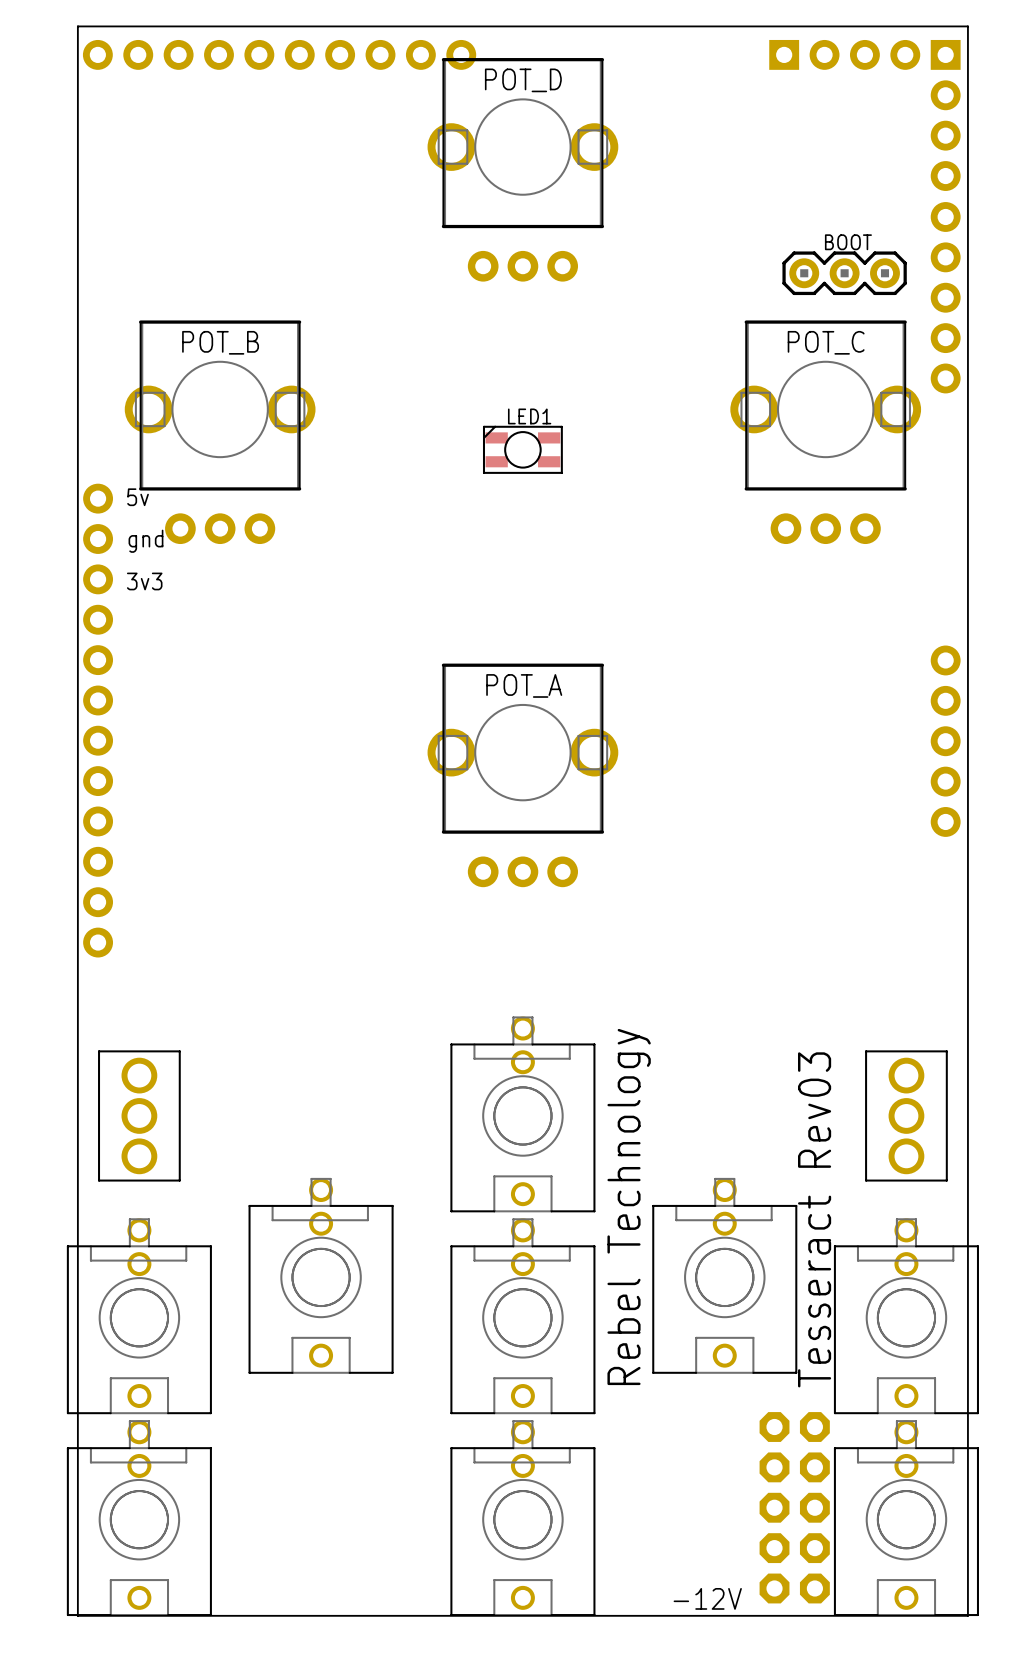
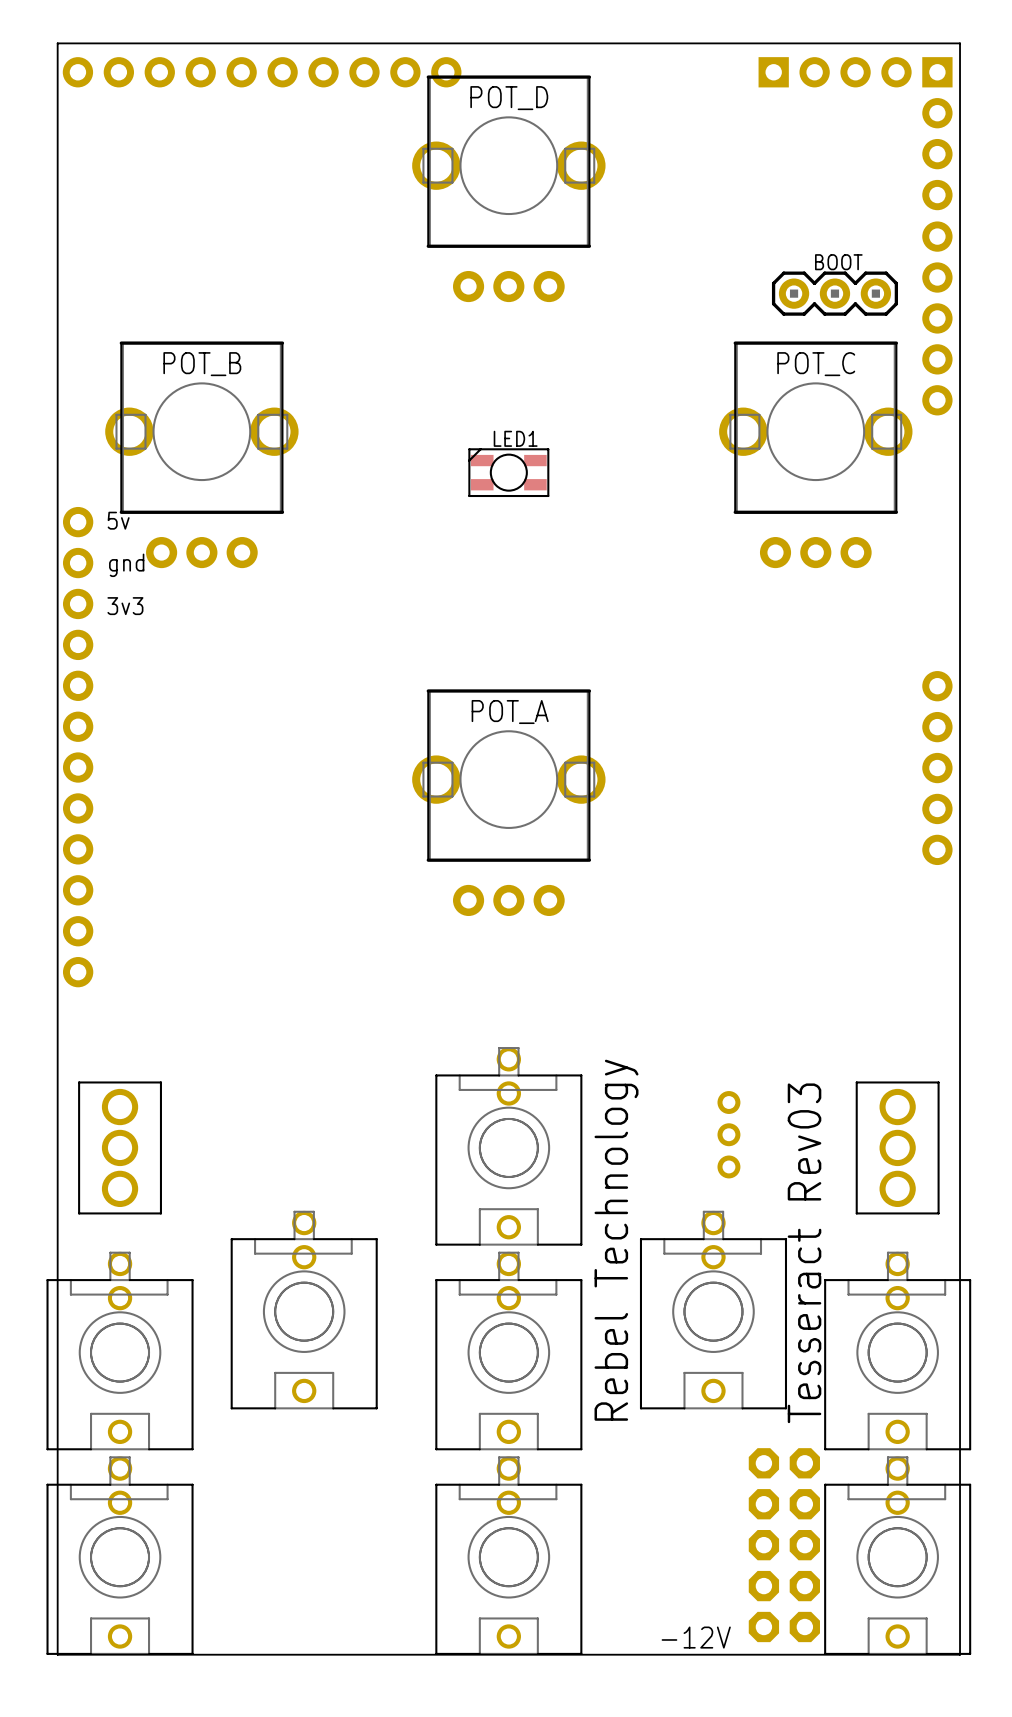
part: none -> (728, 1134)

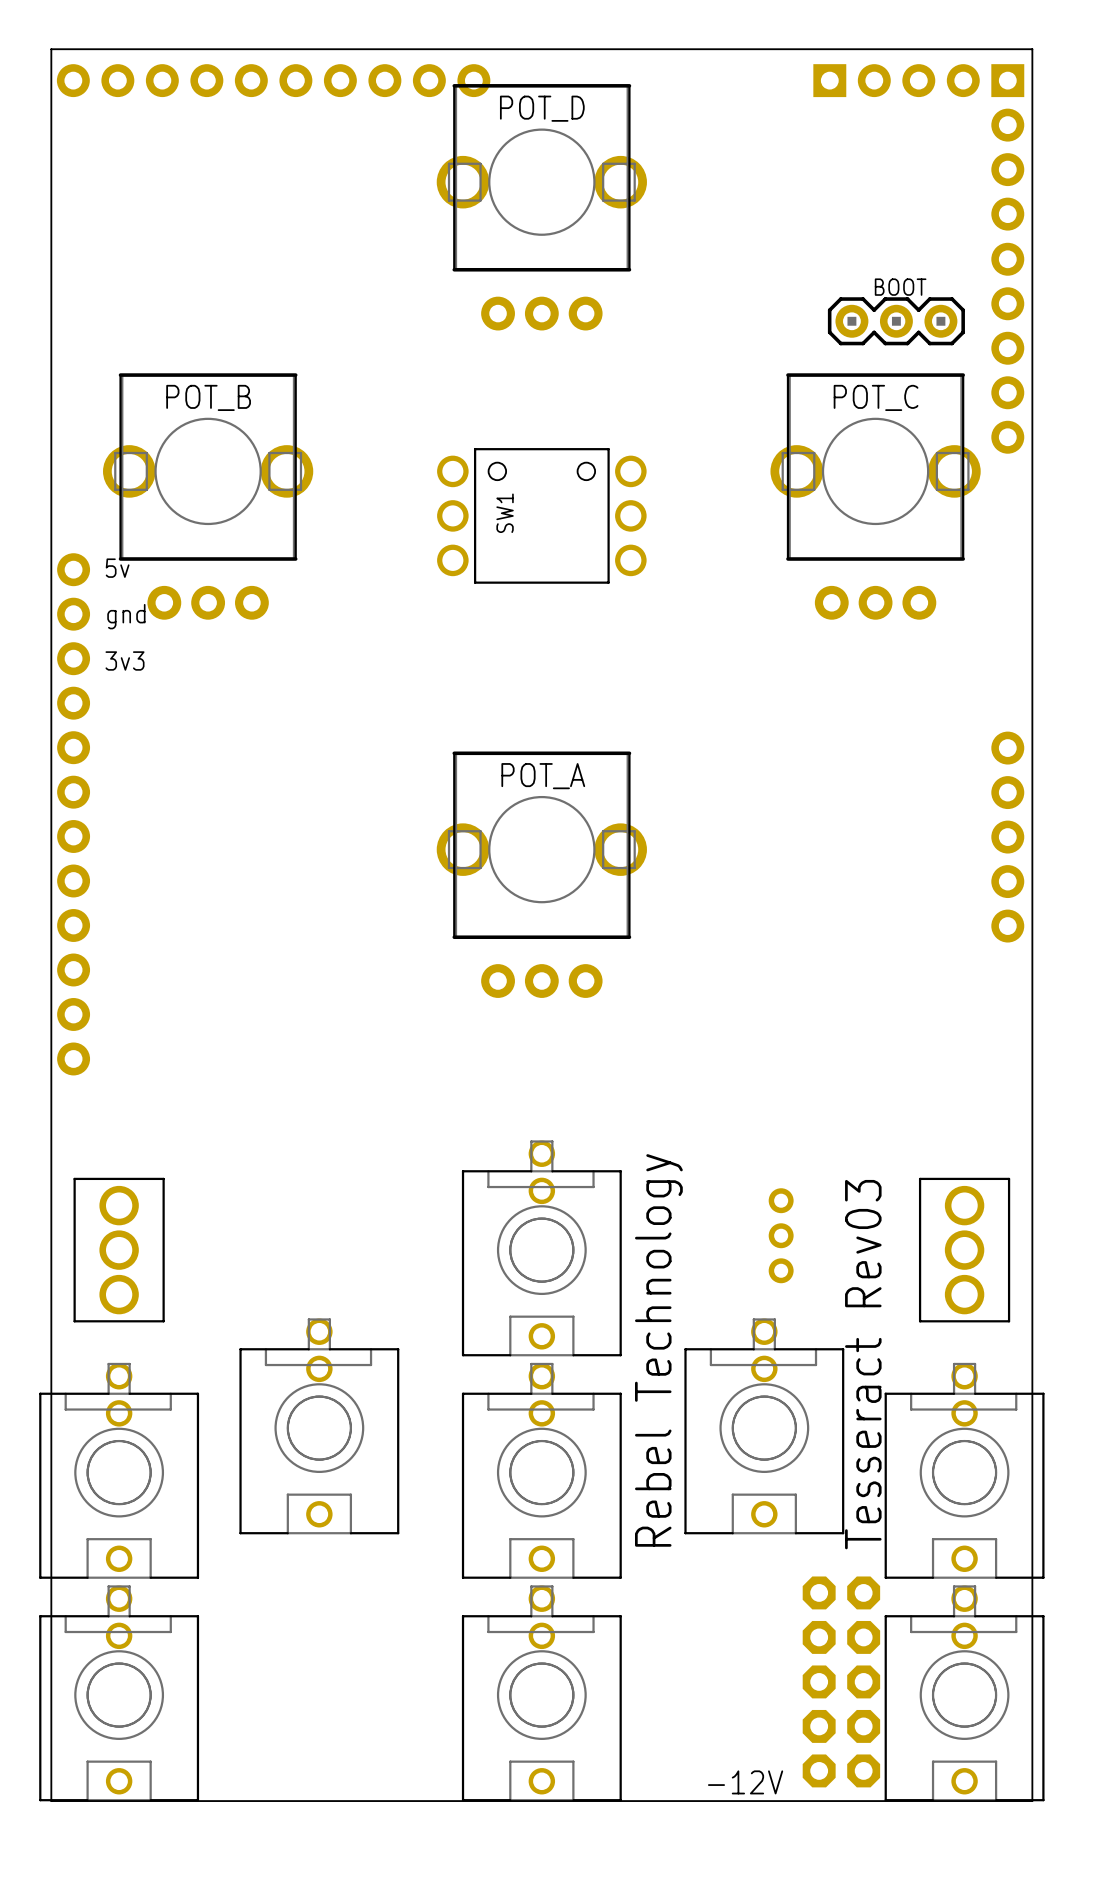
LED1: (508, 472) -> none
SW1: none -> (541, 515)

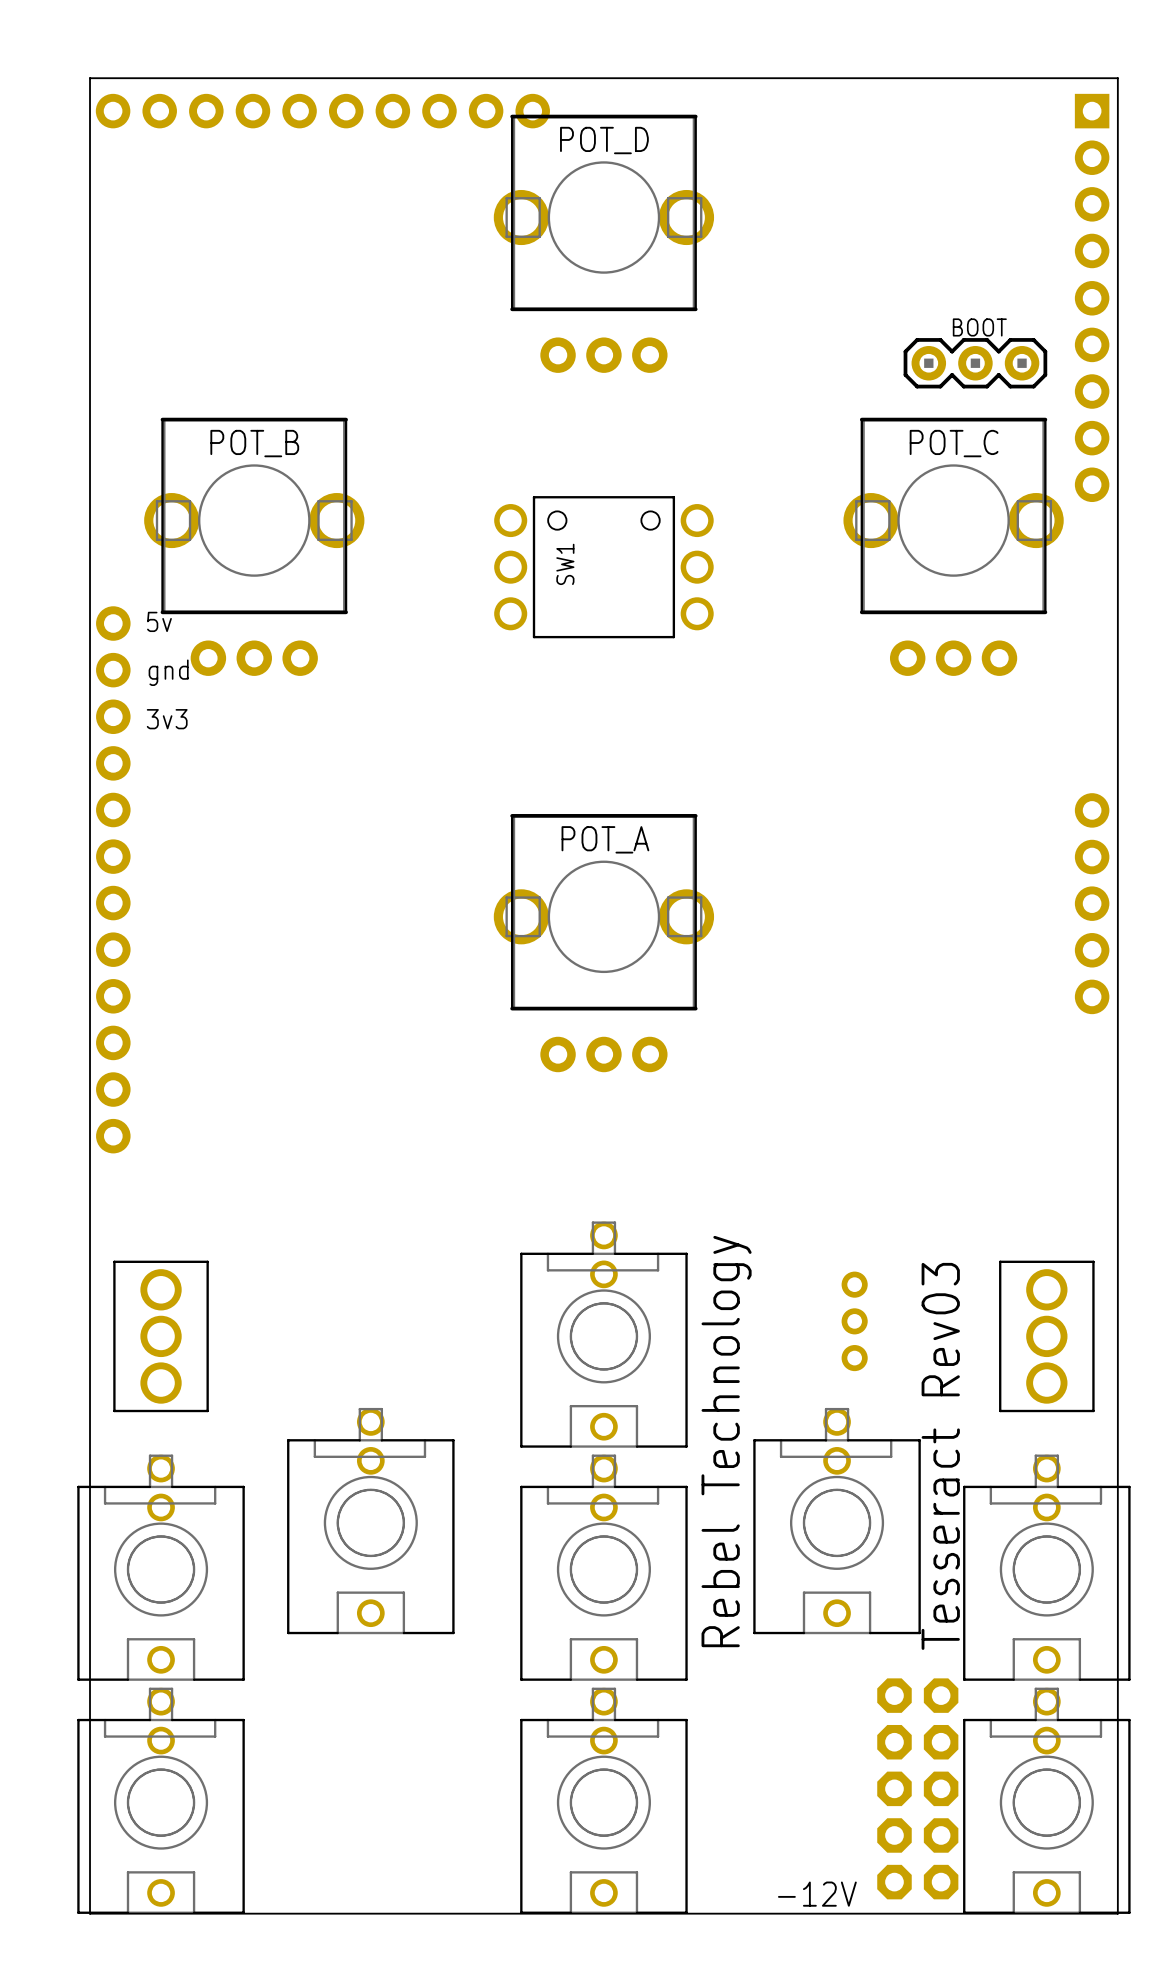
part: (896, 80) -> none

